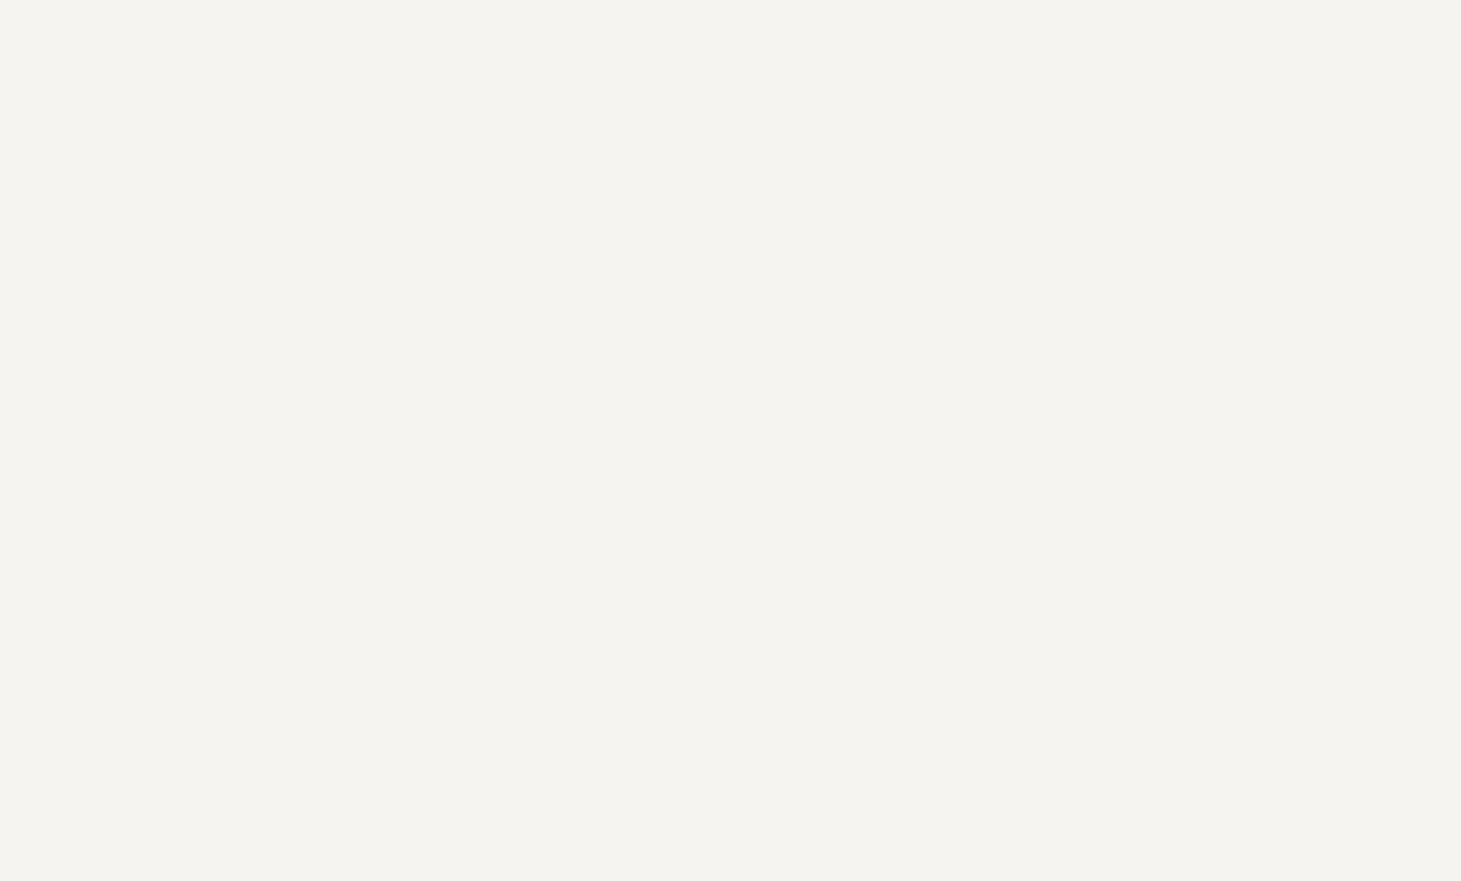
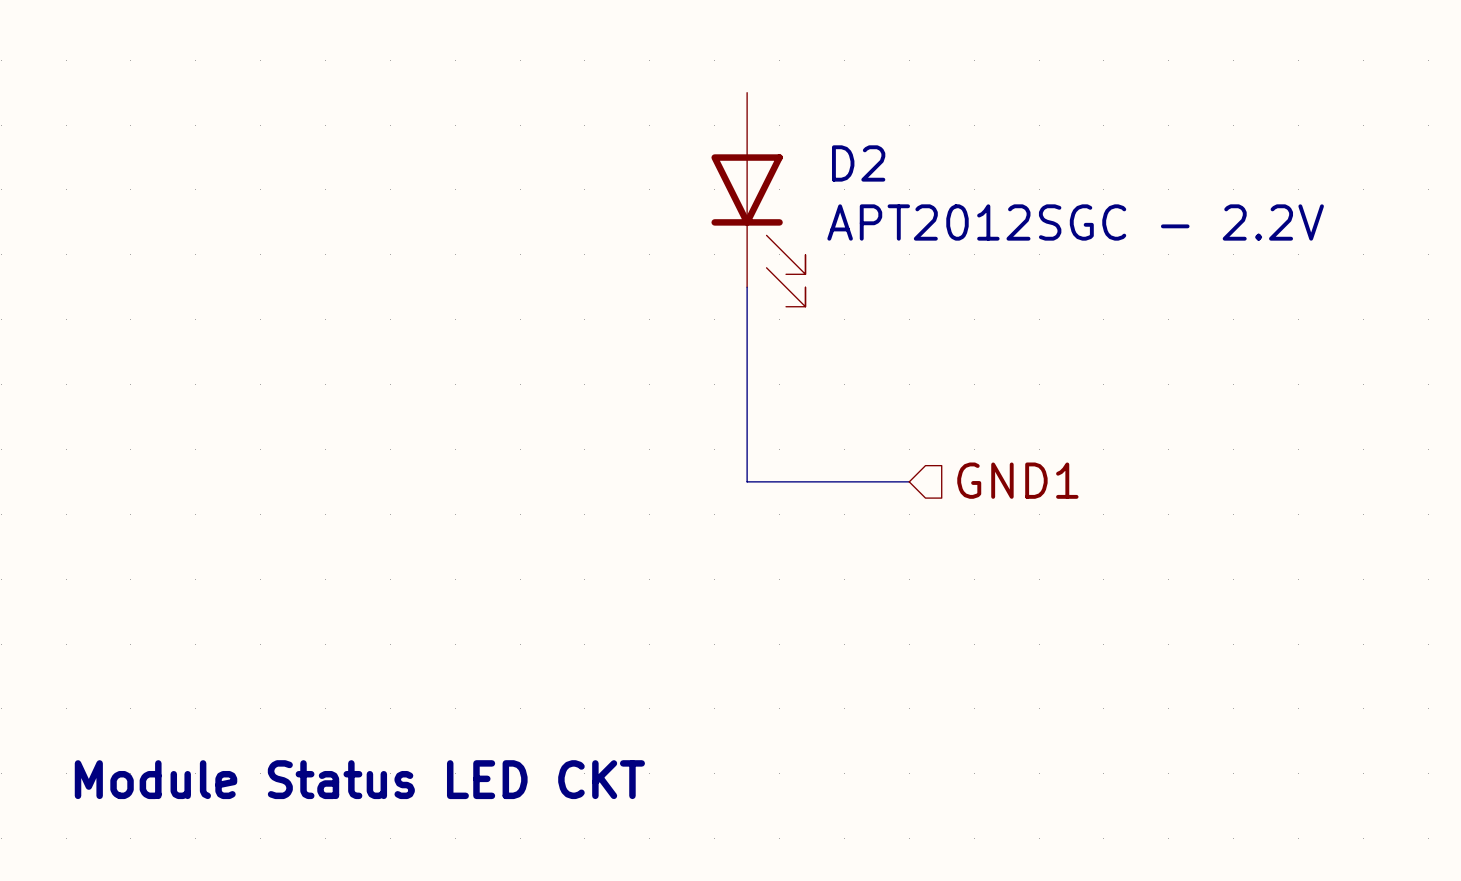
D2: none -> APT2012SGC - 2.2V (758, 199)
wire: none -> (747, 287) (747, 481) (909, 481)
hierarchical label: none -> GND1 (1017, 480)
text: none -> Module Status LED CKT (359, 779)

